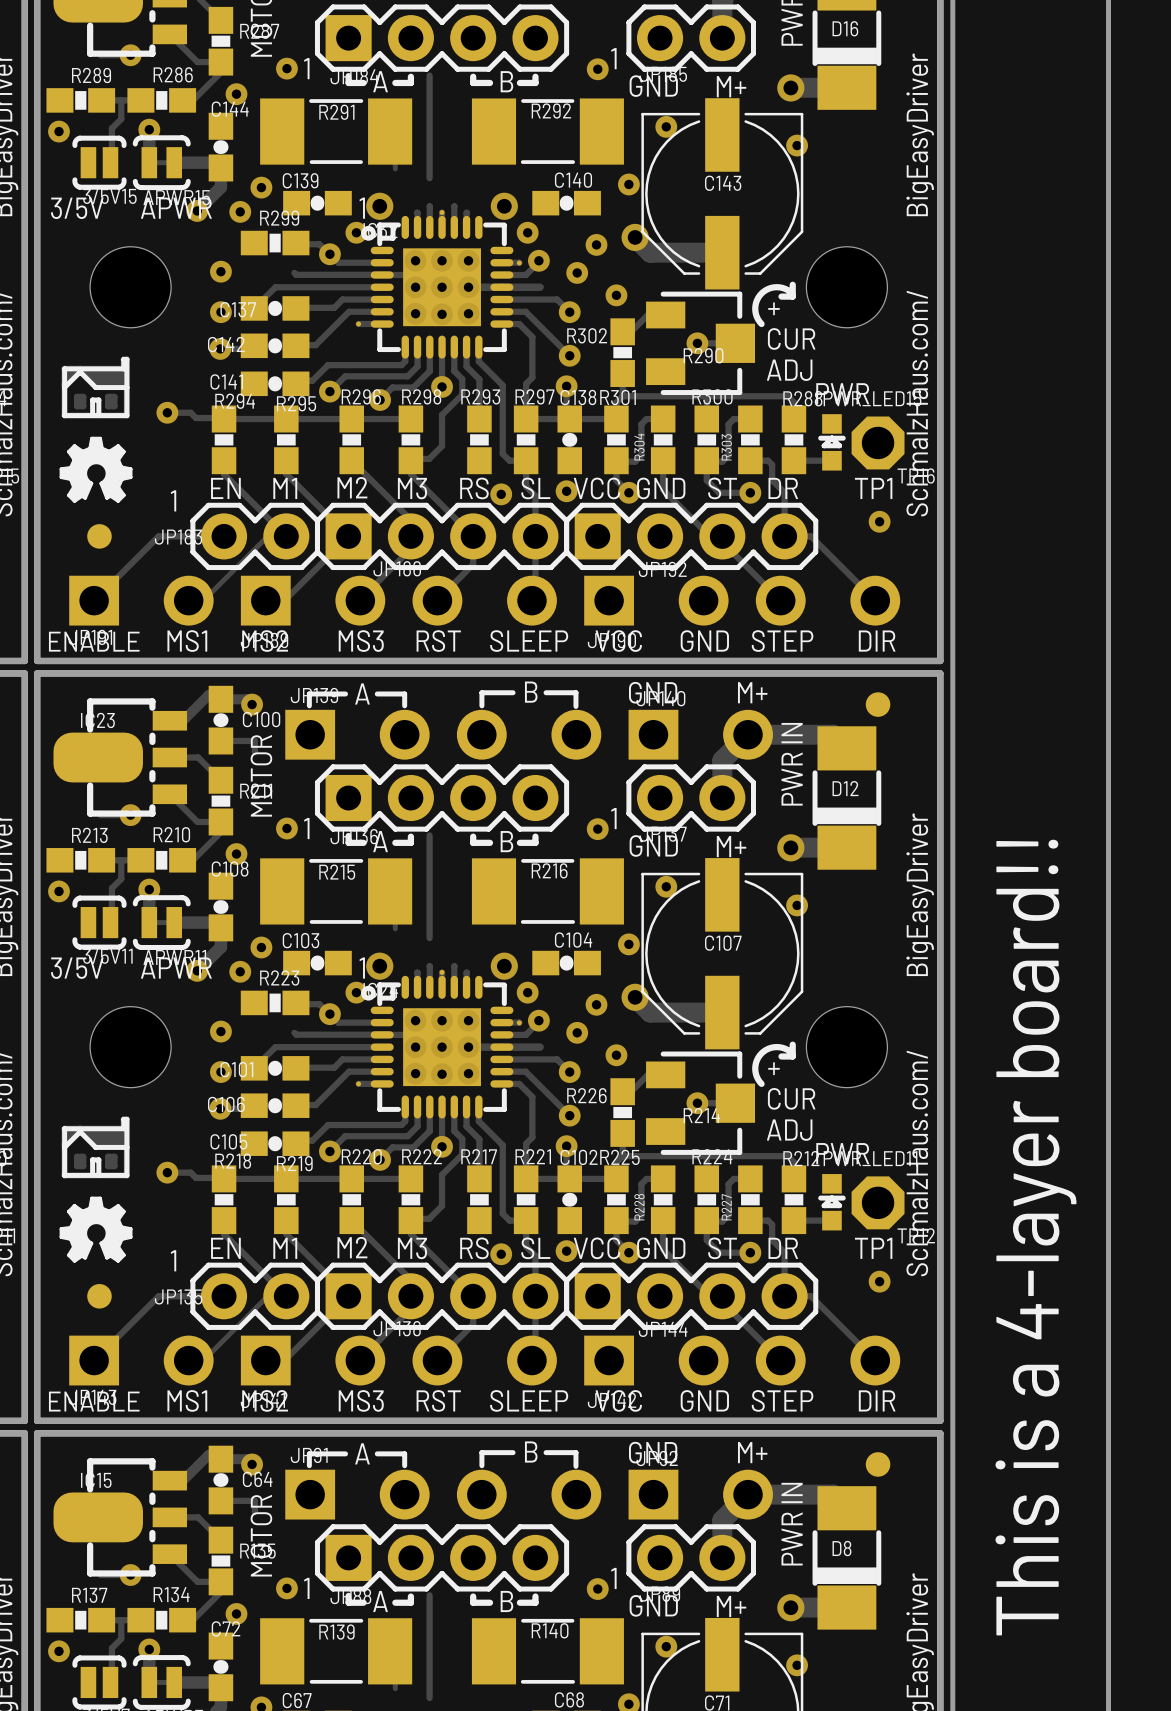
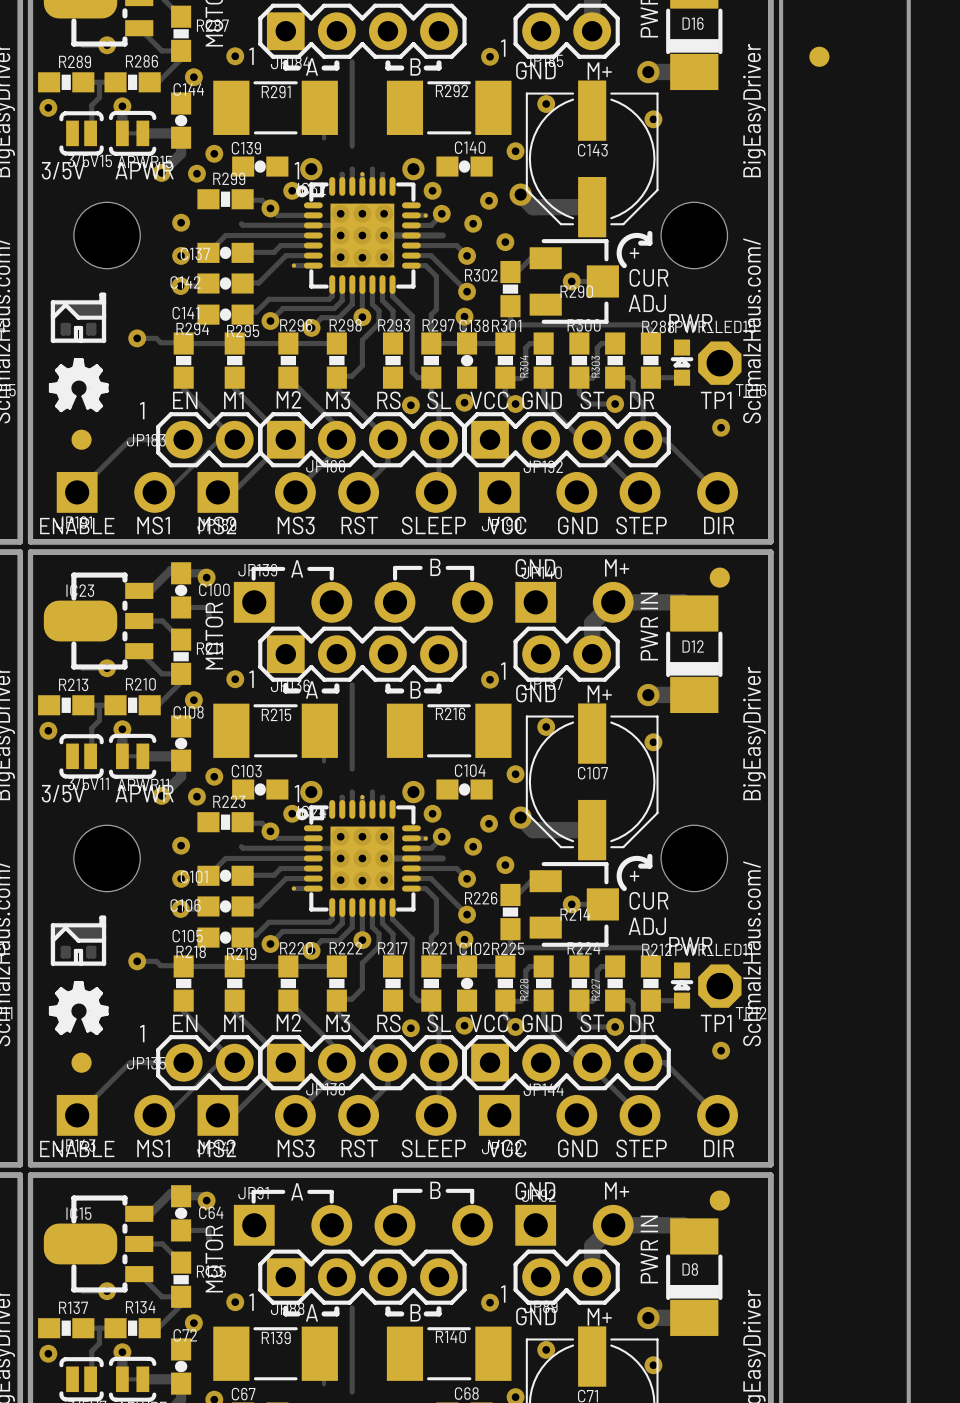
part: none -> (819, 56)
text: This is a 4-layer board!! (1035, 1237) -> none

